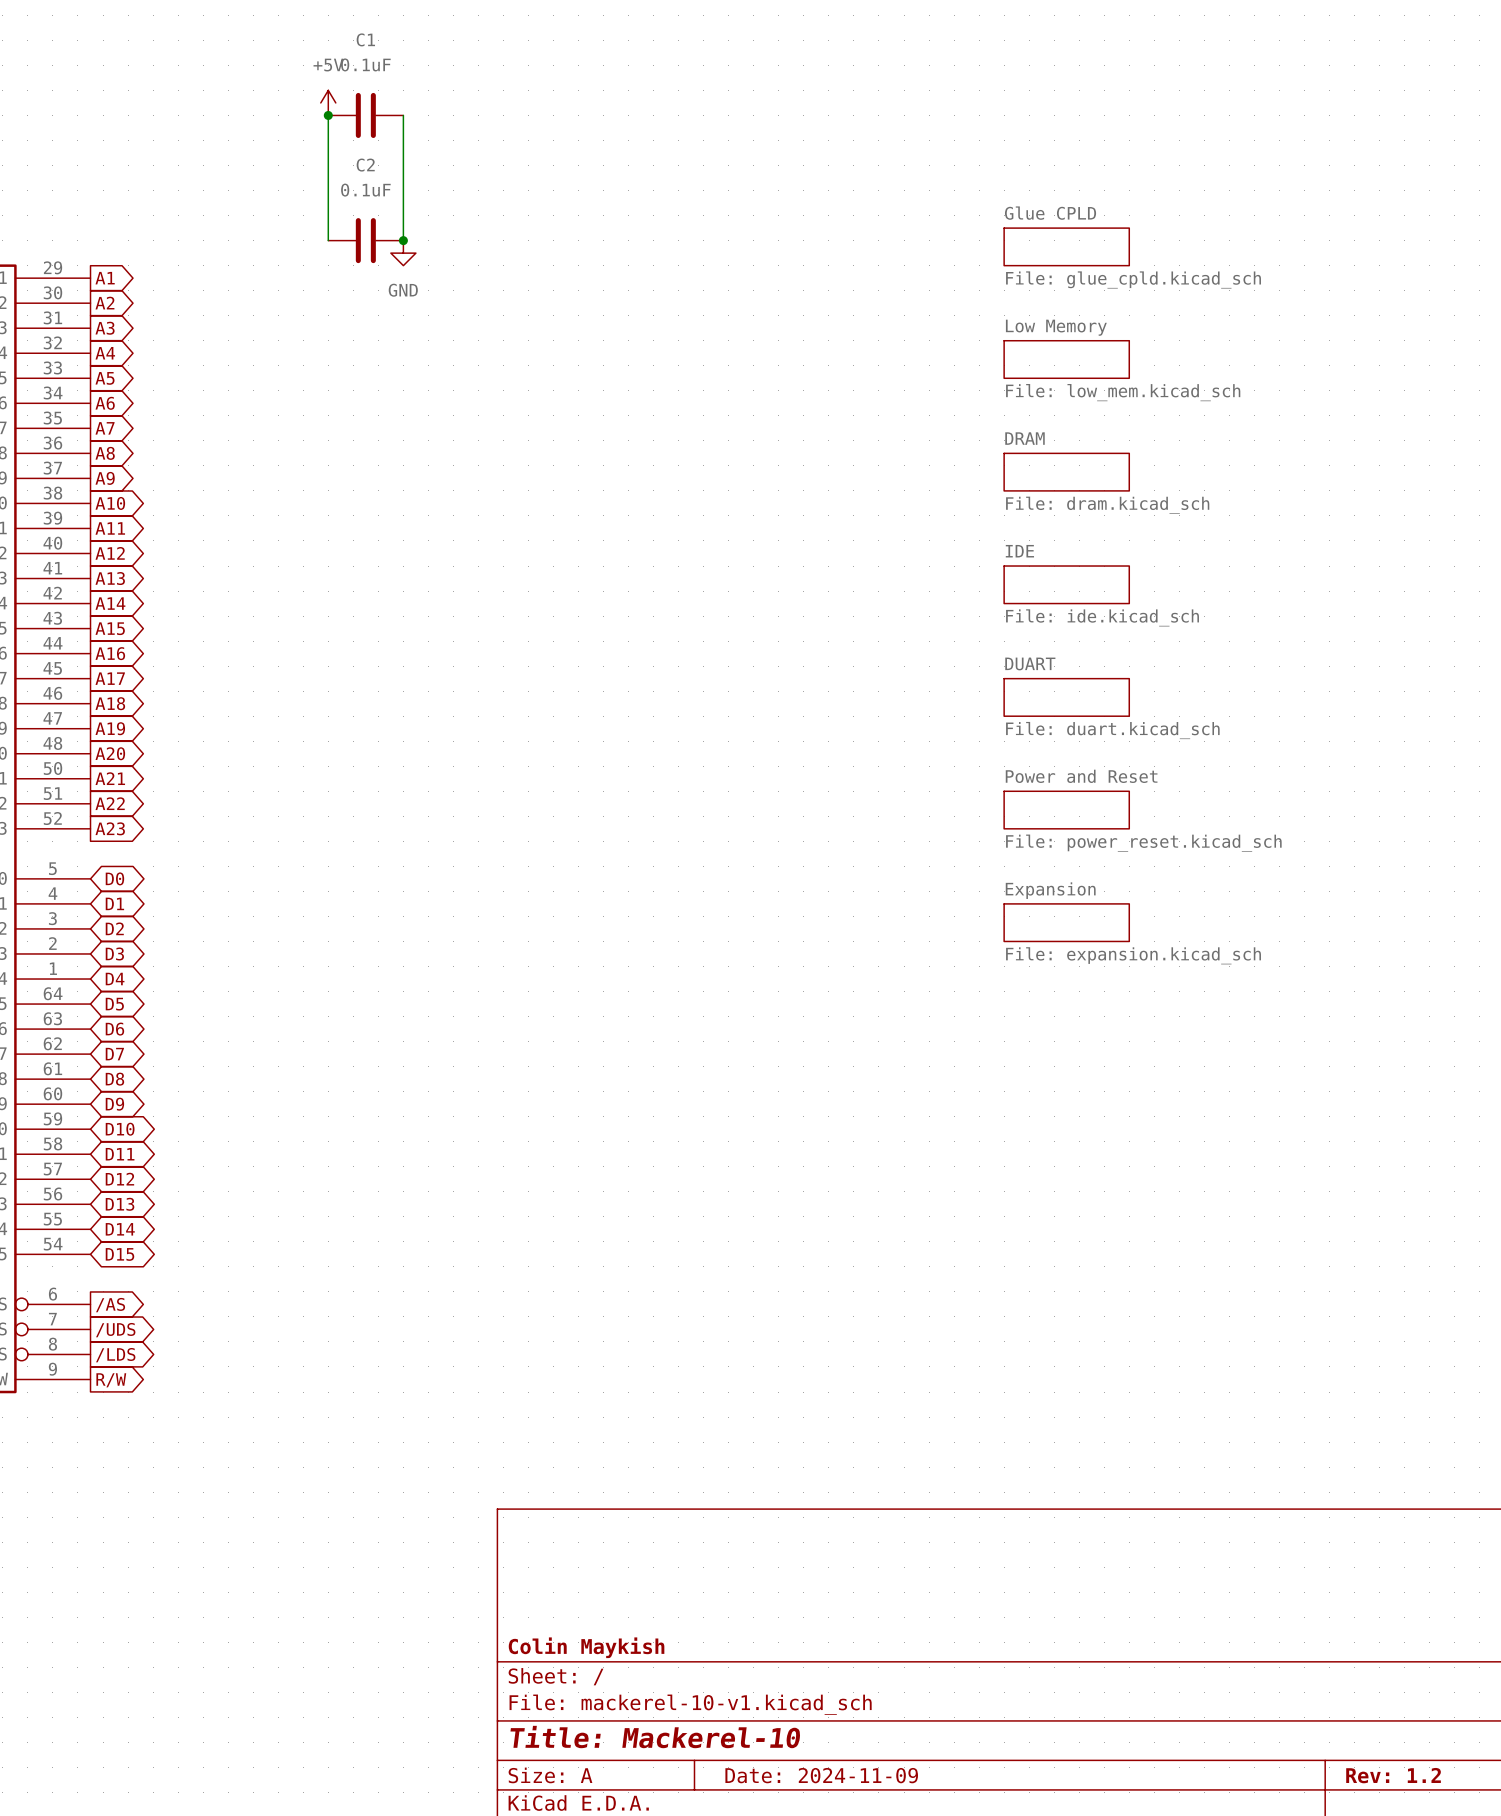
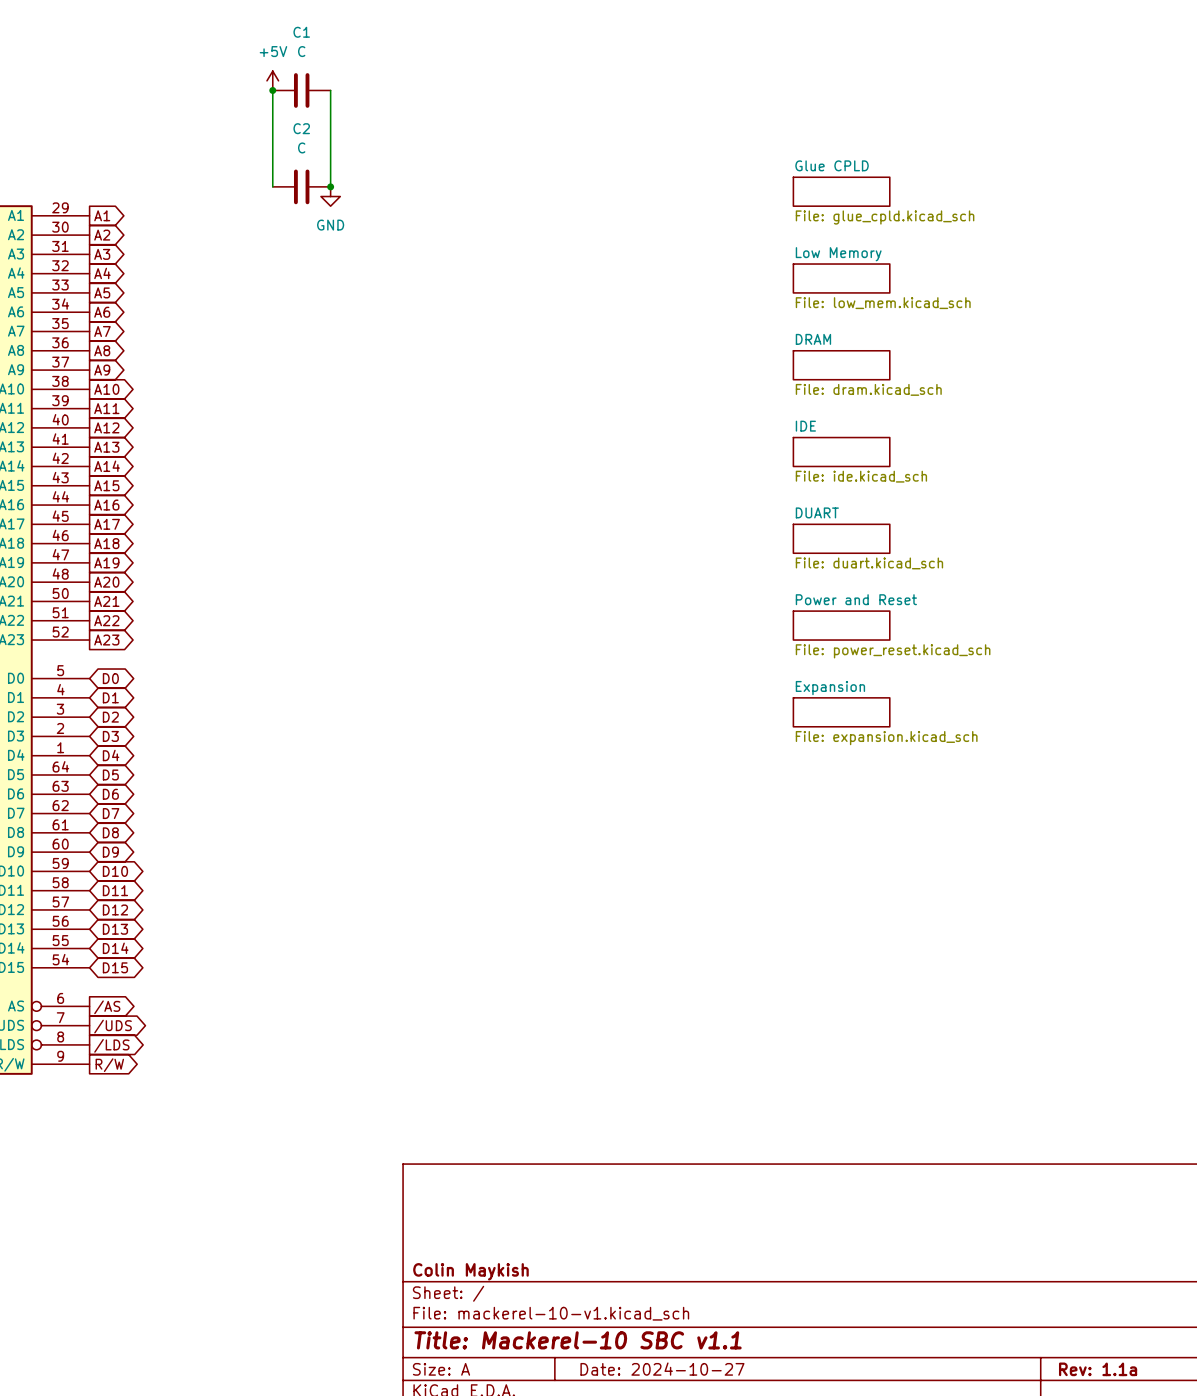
C1 value: 0.1uF (365, 64) -> C (301, 51)
C2 value: 0.1uF (365, 190) -> C (301, 147)
title block: Title: Mackerel-10 (655, 1737) -> Title: Mackerel-10 SBC v1.1 (578, 1340)
title block: Date: 2024-11-09 (821, 1775) -> Date: 2024-10-27 (662, 1369)
title block: Rev: 1.2 (1393, 1775) -> Rev: 1.1a (1098, 1369)

